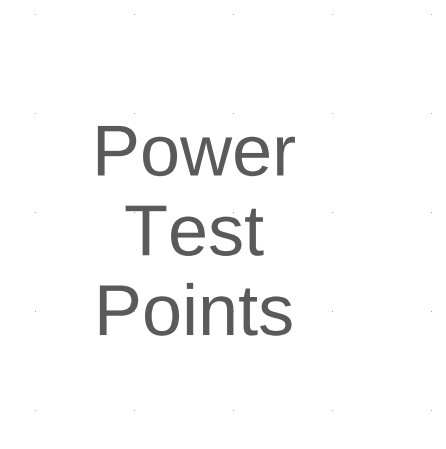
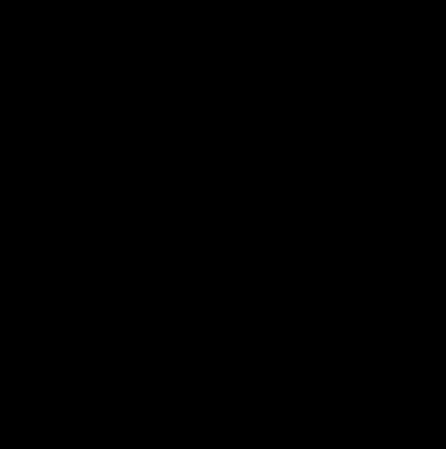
text: Power (196, 151) -> none
text: Test (194, 230) -> none
text: Points (195, 309) -> none

